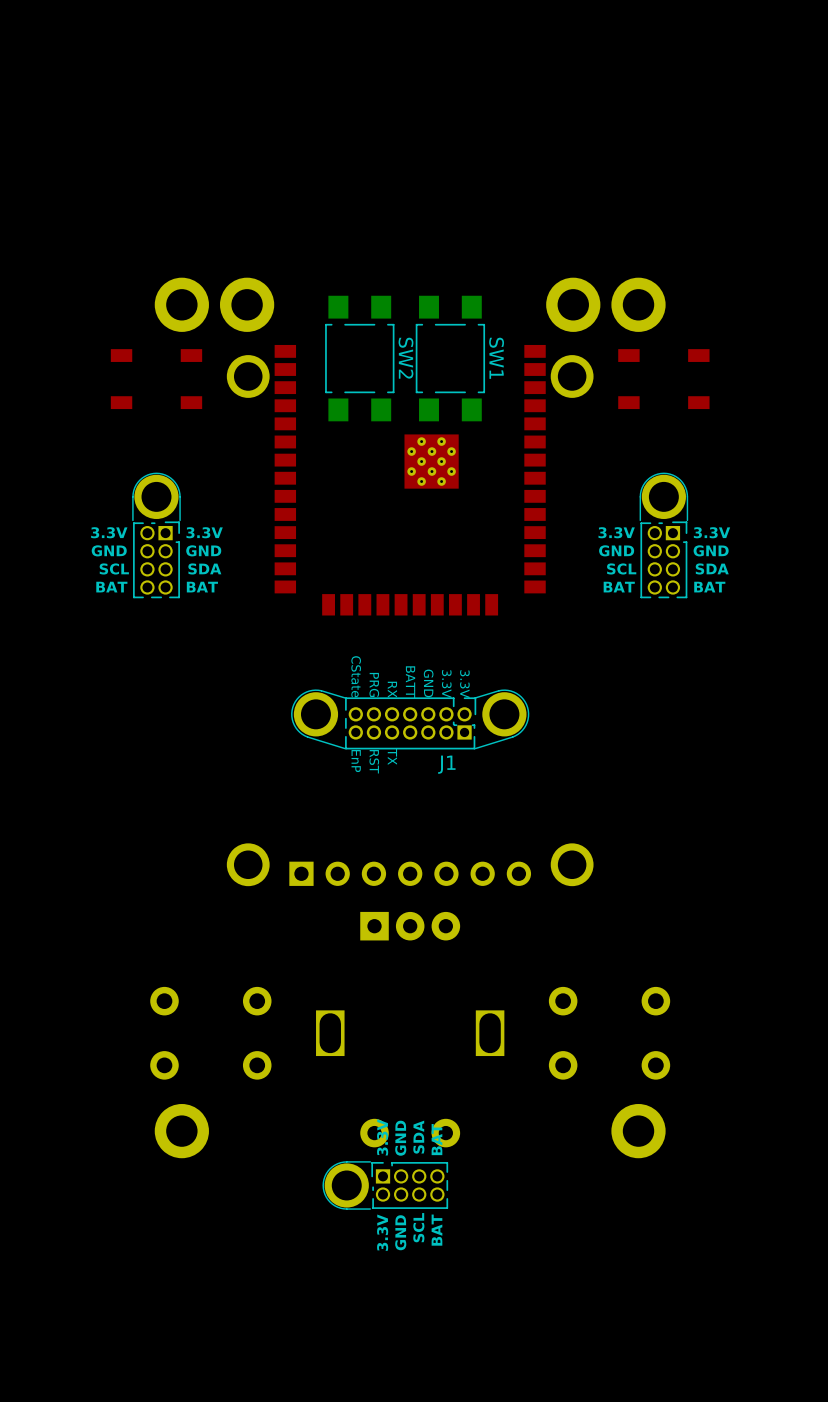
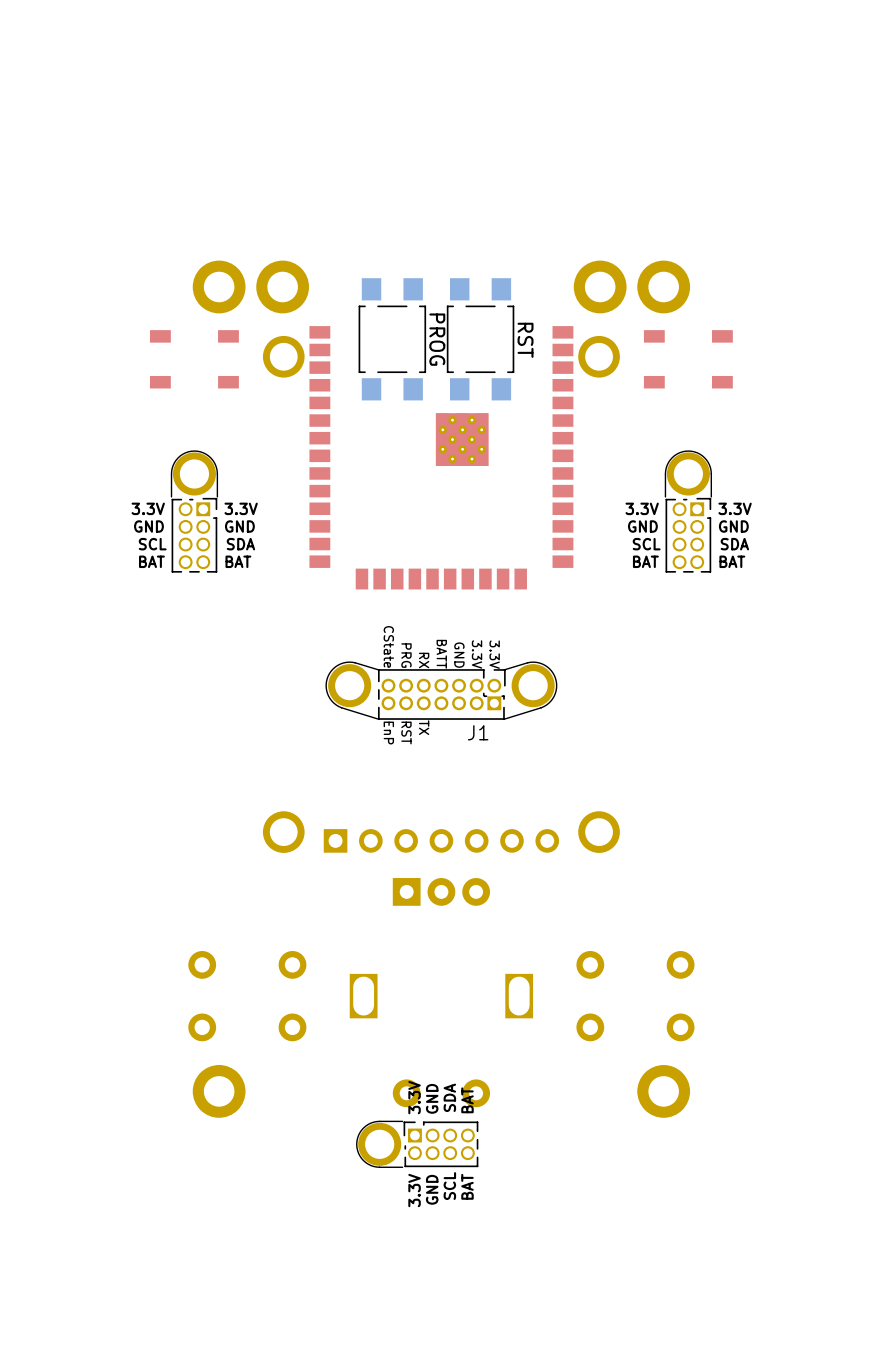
SW2 name: SW2 (405, 358) -> PROG (437, 339)
SW1 name: SW1 (496, 358) -> RST (525, 340)

